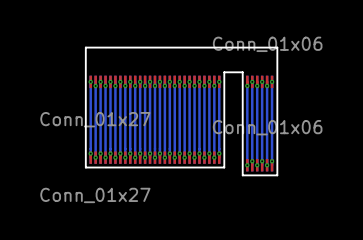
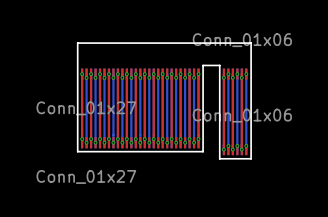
top track: none -> (82, 74) (82, 139)
top track: none -> (91, 74) (91, 139)
top track: none -> (100, 74) (100, 139)
top track: none -> (108, 74) (108, 139)
top track: none -> (117, 74) (117, 139)
top track: none -> (126, 74) (126, 139)
top track: none -> (135, 74) (135, 139)
top track: none -> (144, 74) (144, 139)
top track: none -> (153, 74) (153, 139)
top track: none -> (162, 74) (162, 139)
top track: none -> (171, 74) (171, 139)
top track: none -> (180, 74) (180, 139)
top track: none -> (189, 74) (189, 139)
top track: none -> (198, 74) (198, 139)
top track: none -> (223, 77) (223, 149)
top track: none -> (232, 77) (232, 149)
top track: none -> (241, 77) (241, 149)

